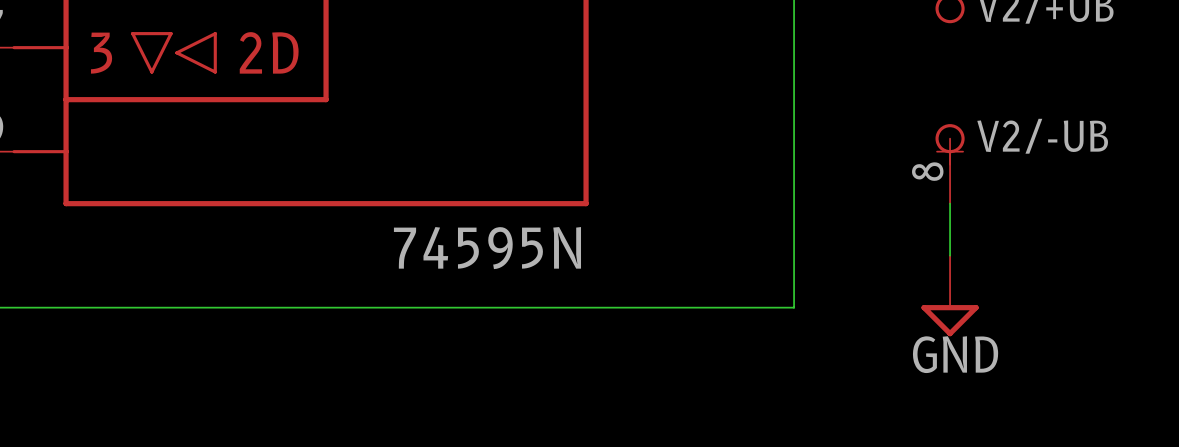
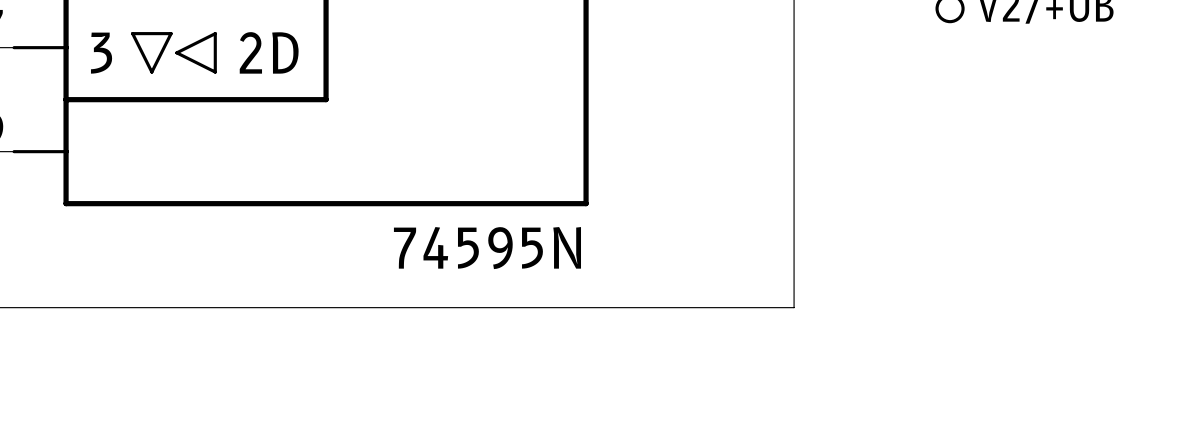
V2/-UB: (950, 163) -> none
wire: (950, 203) (950, 255) -> none
power symbol: GND (950, 295) -> none

